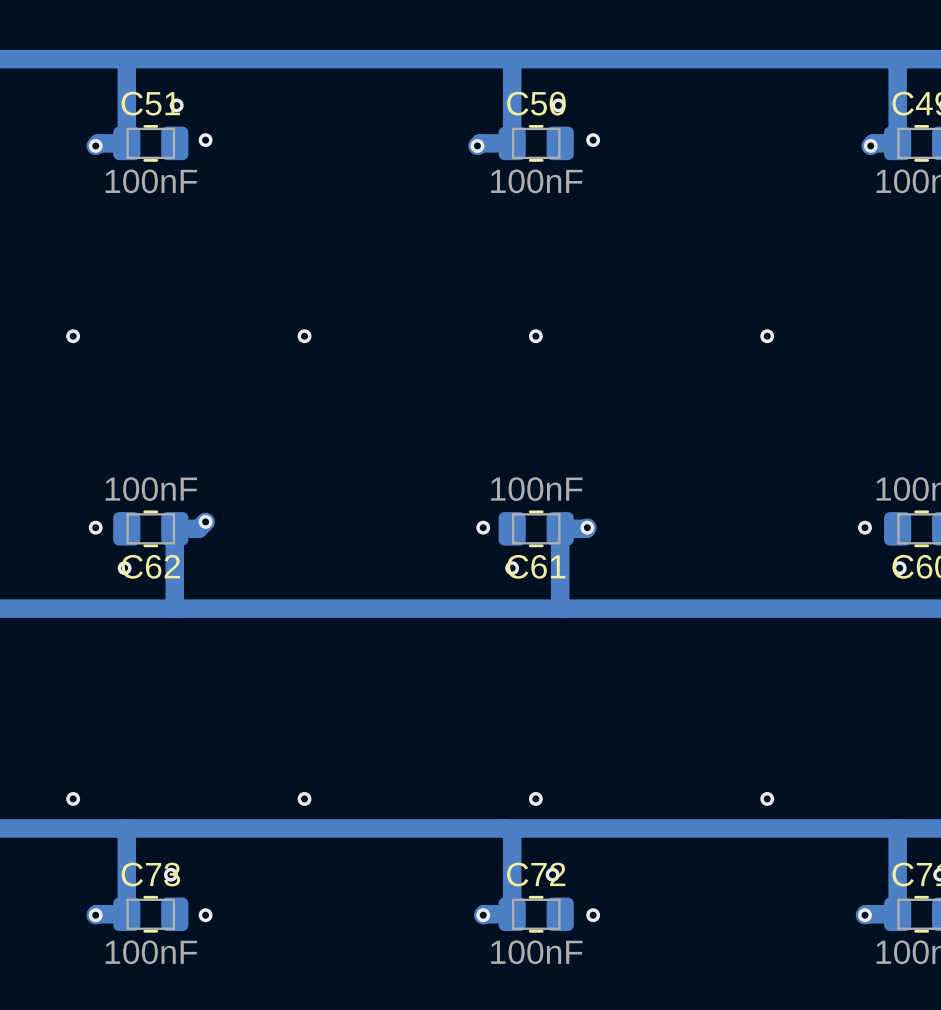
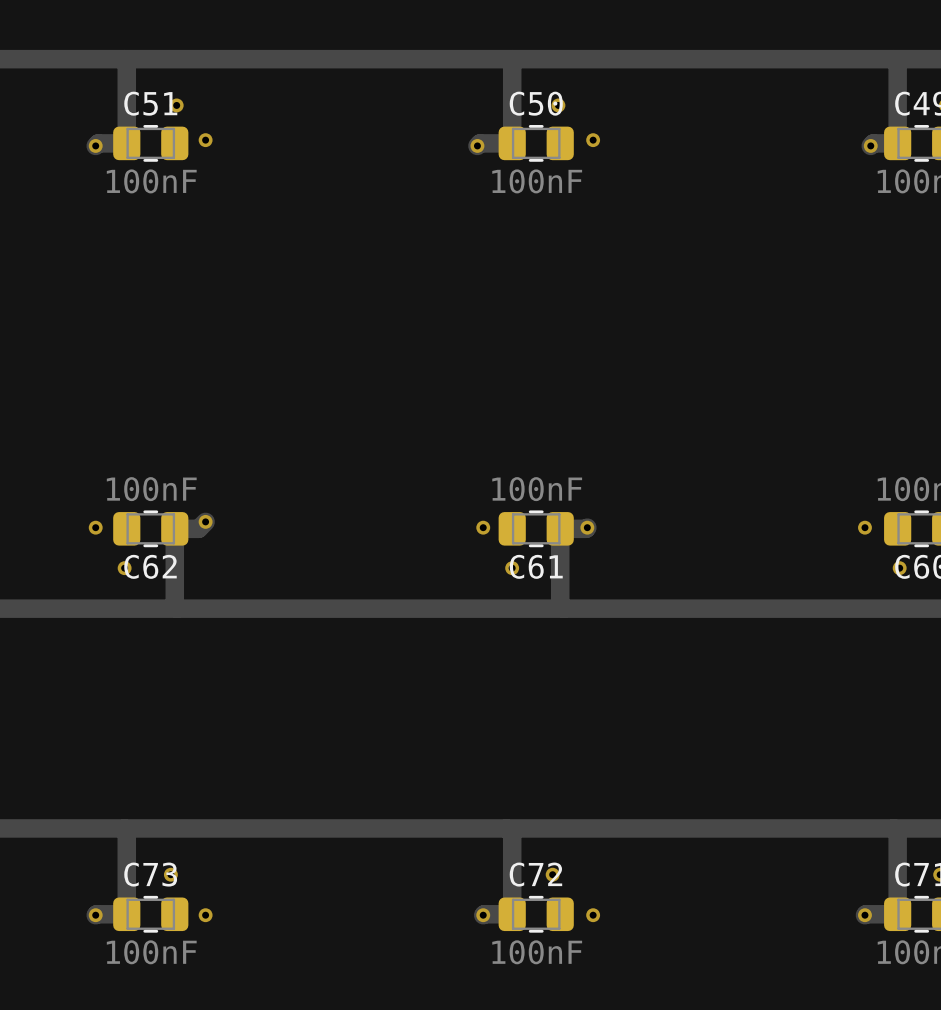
via: (73, 336) -> none
via: (304, 336) -> none
via: (535, 336) -> none
via: (767, 336) -> none
via: (73, 798) -> none
via: (304, 798) -> none
via: (535, 798) -> none
via: (767, 798) -> none

